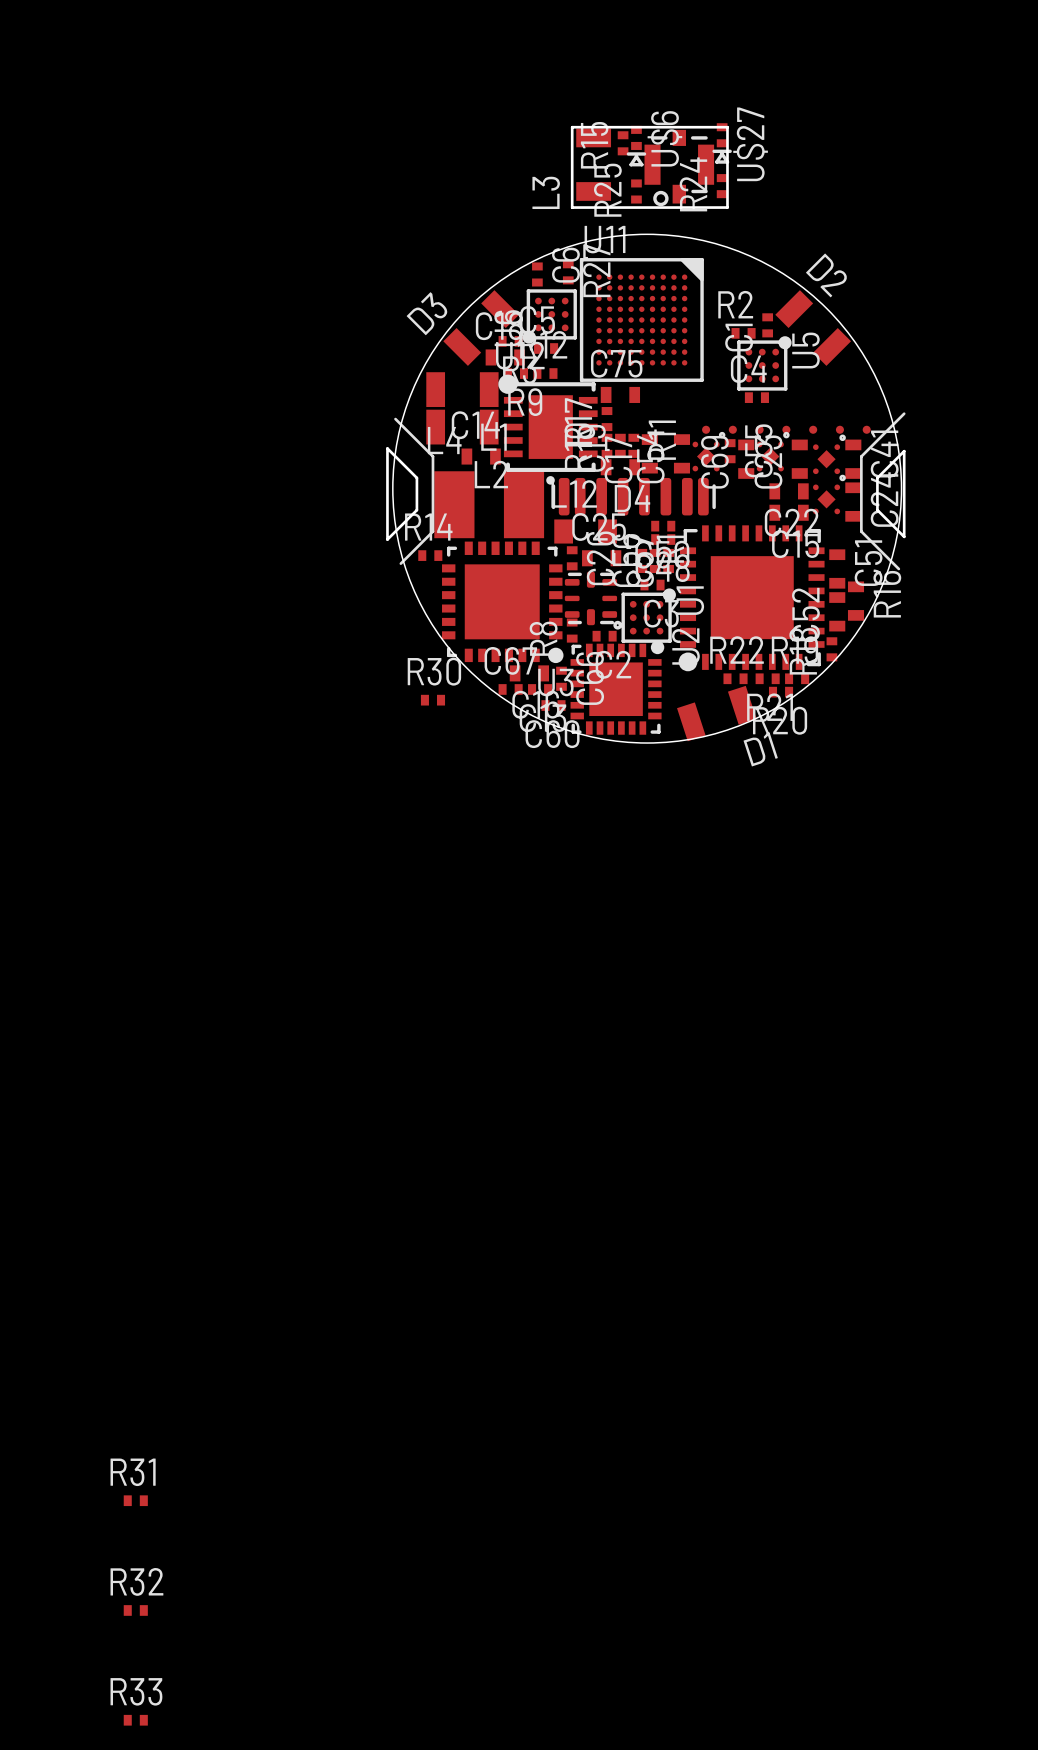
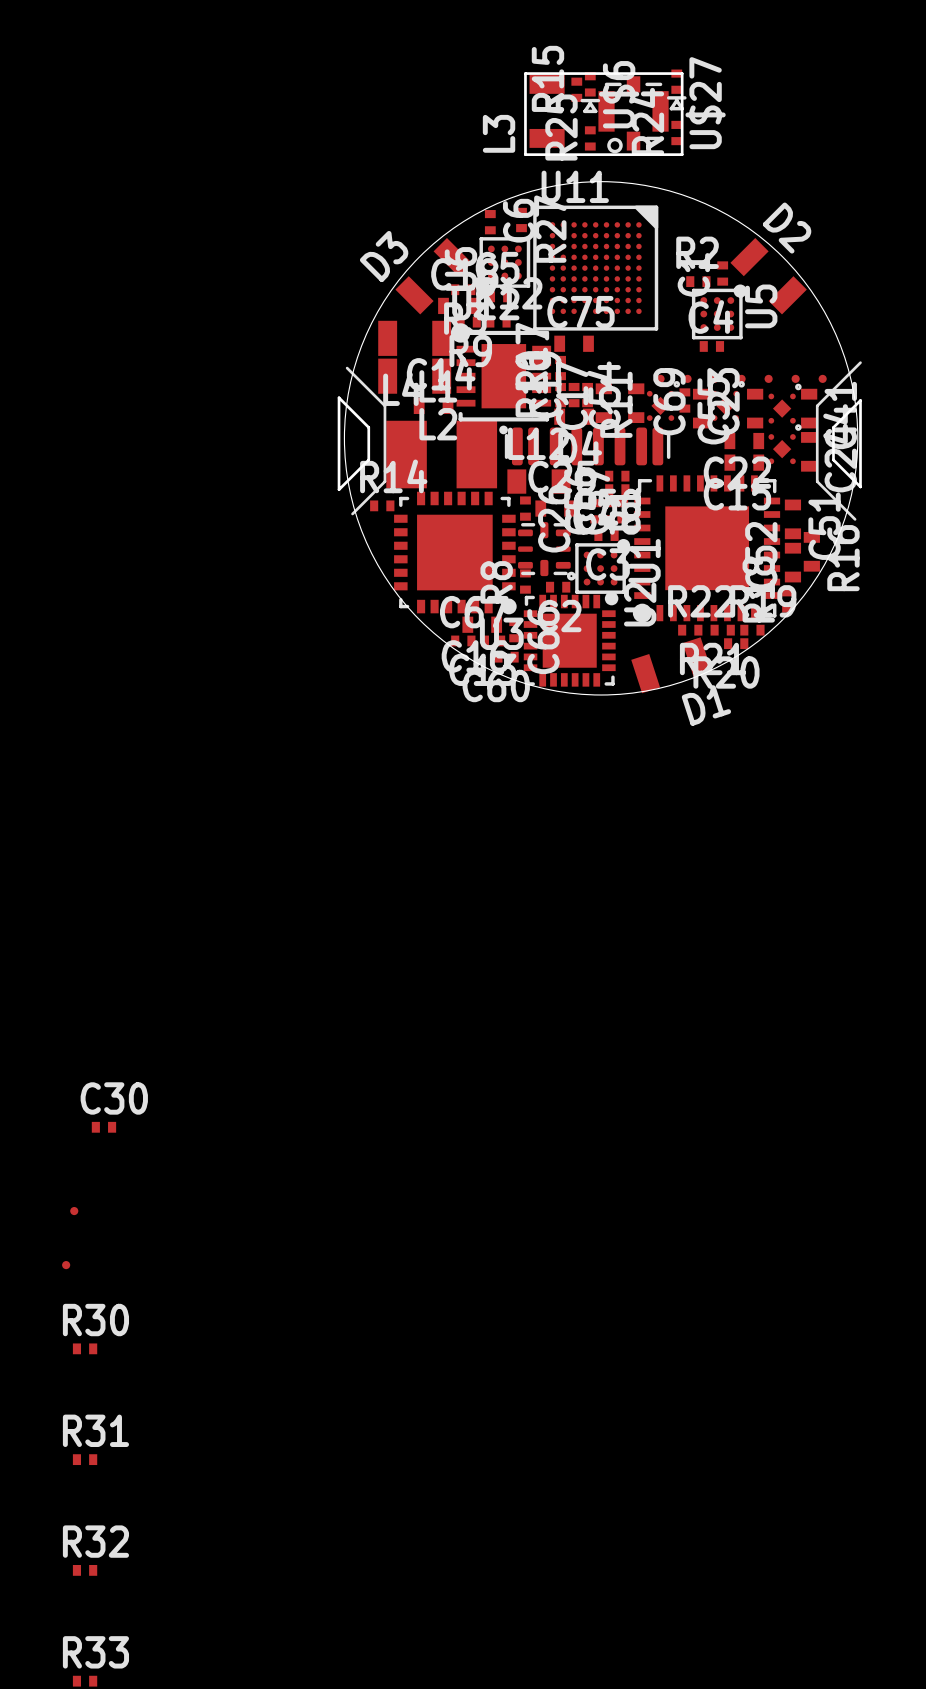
R30 position: (432, 700) -> (85, 1348)
C30: none -> (103, 1127)
part: none -> (74, 1211)
part: none -> (66, 1265)

